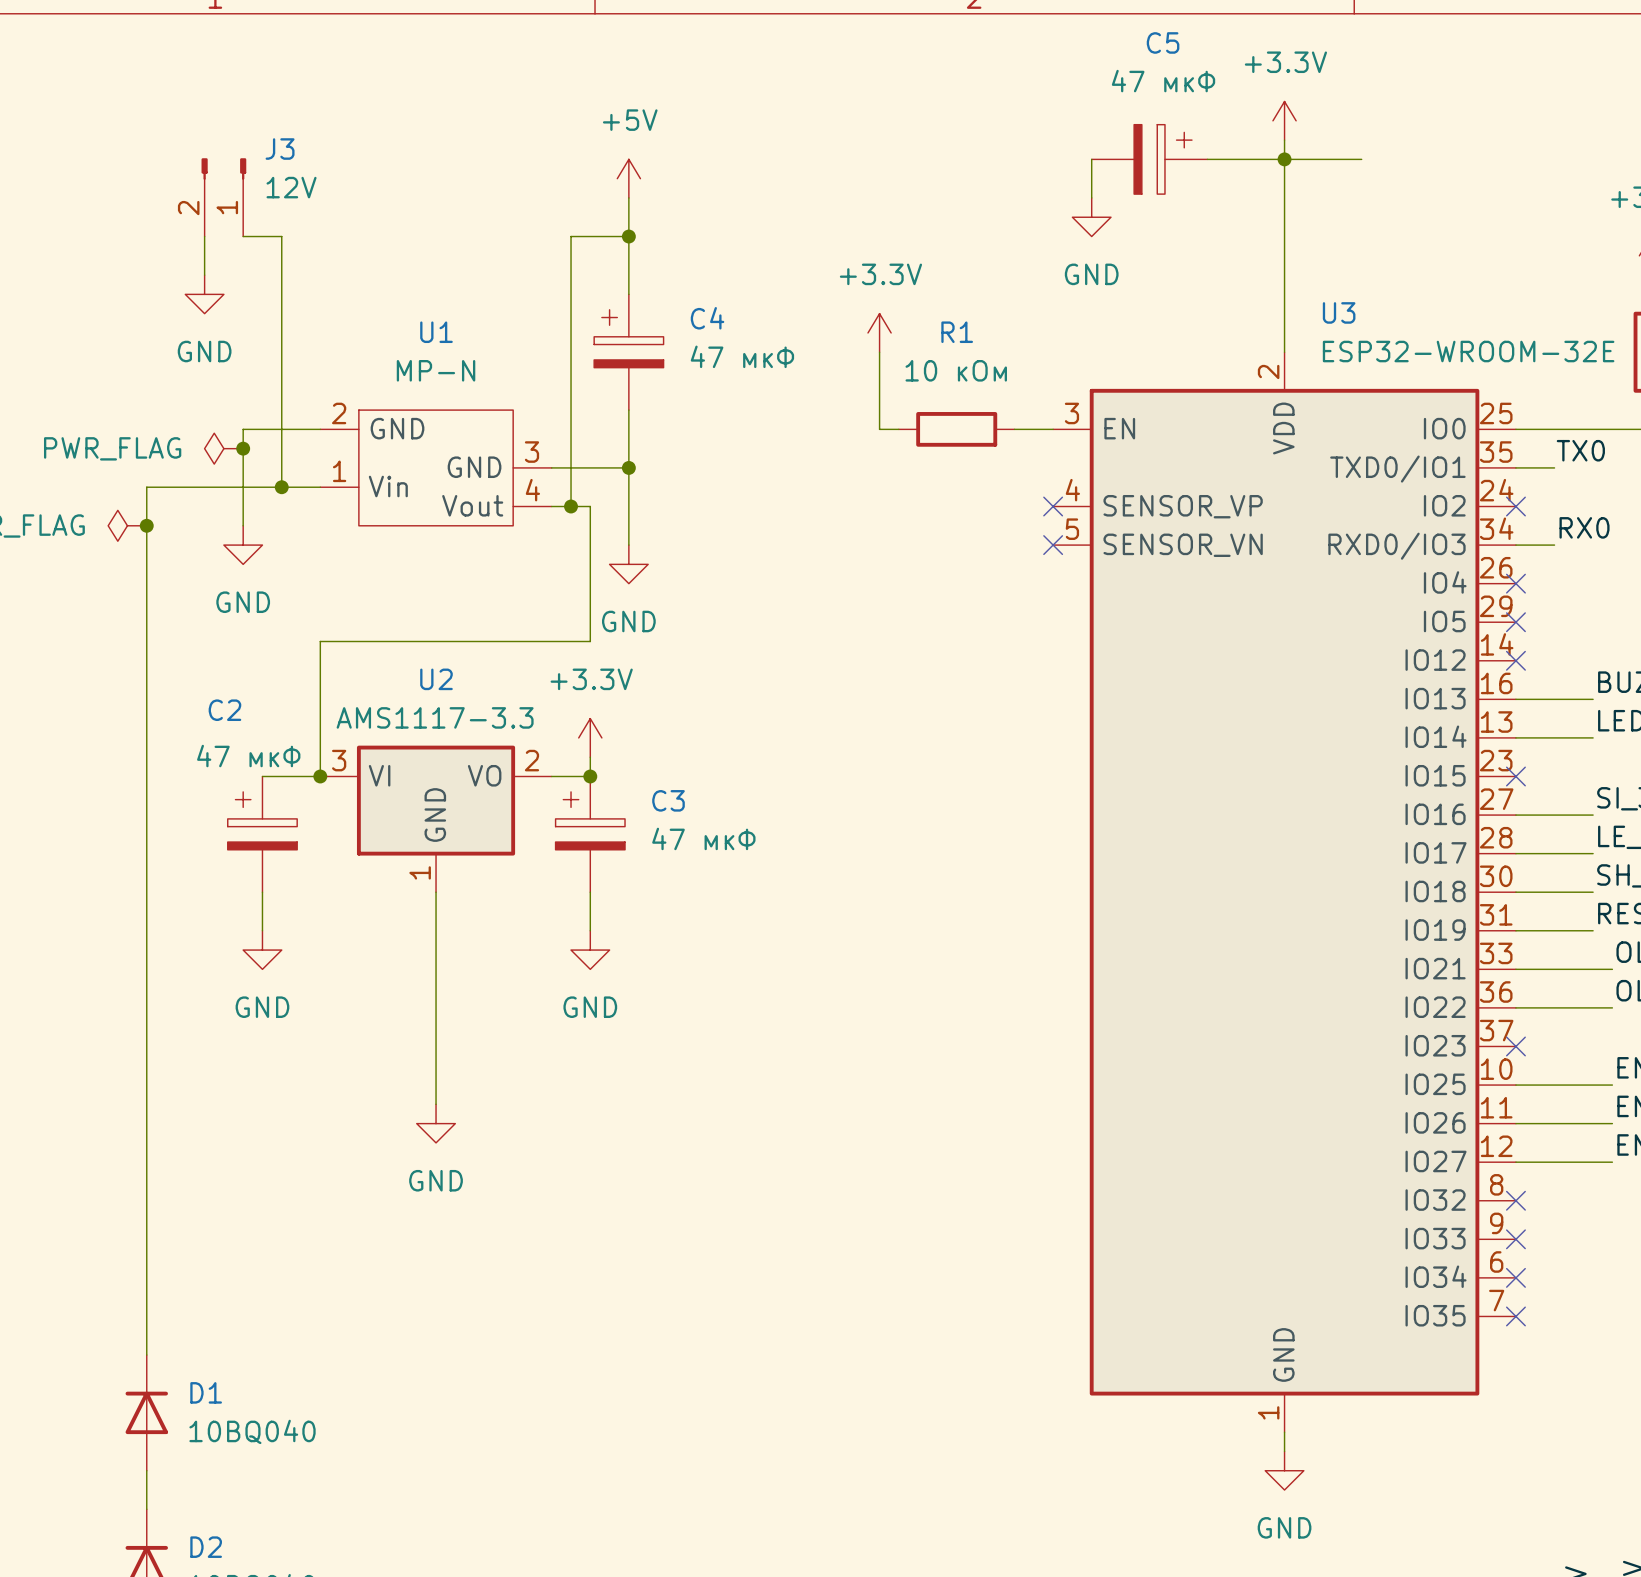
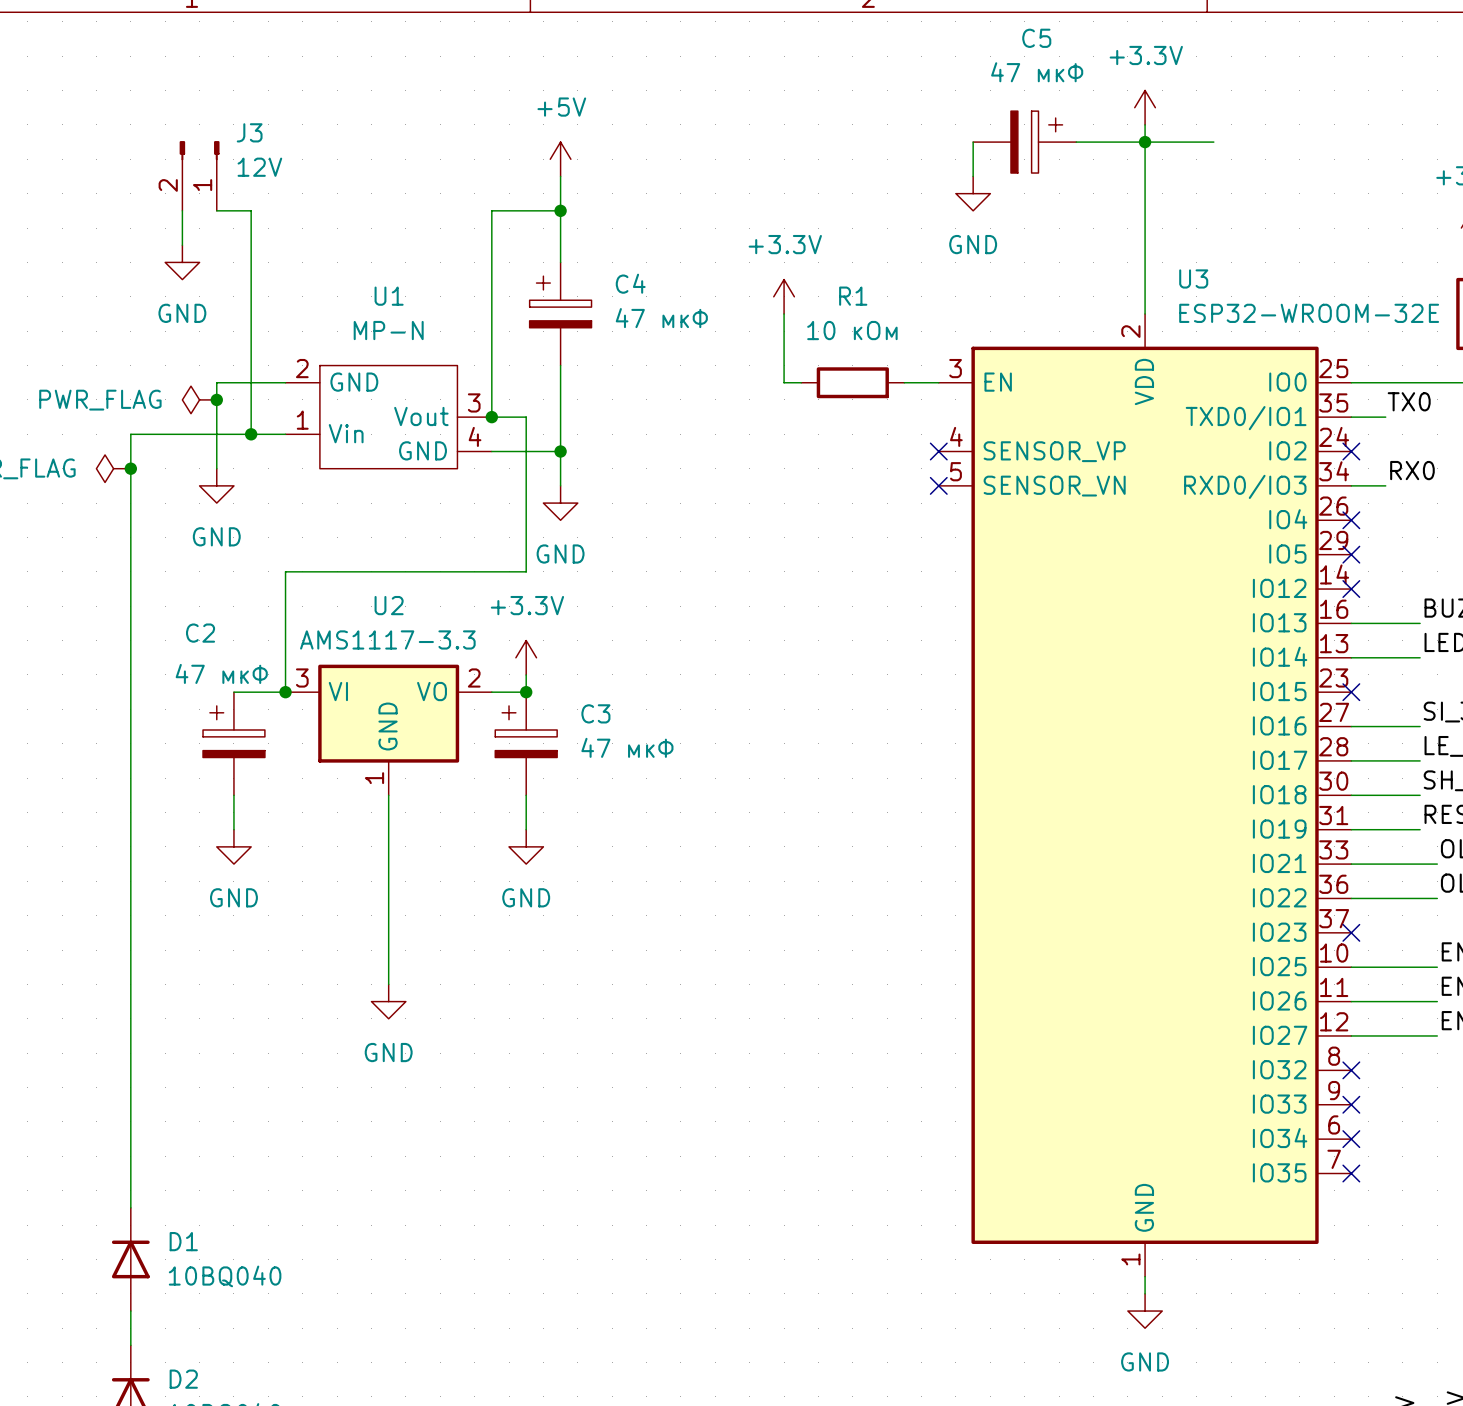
wire: (571, 236) (571, 506) -> (509, 210) (491, 210) (491, 417)
U1 pin name: GND (474, 467) -> Vout (421, 416)
junction: none -> (491, 417)
wire: (590, 467) (628, 467) -> (526, 417) (526, 451) (560, 451)
junction: (628, 467) -> none
U1 pin name: Vout (472, 505) -> GND (423, 450)
junction: (571, 506) -> none
junction: none -> (560, 451)

